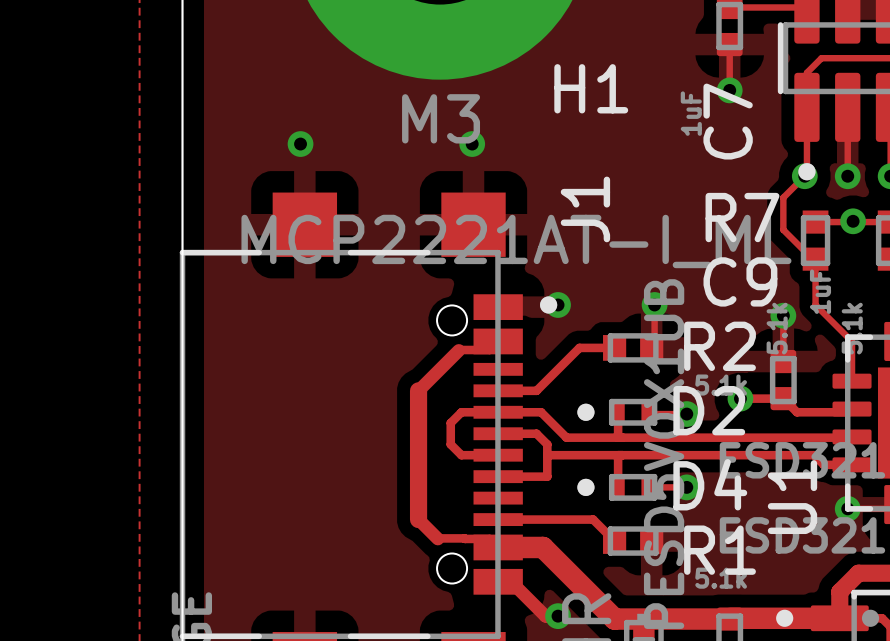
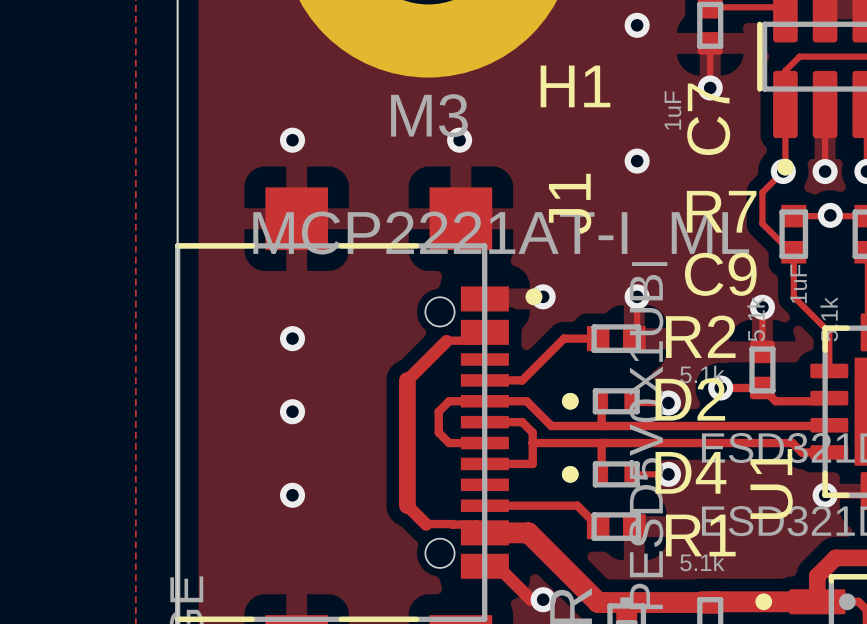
via: none -> (637, 25)
via: none -> (637, 161)
via: none -> (292, 338)
via: none -> (292, 411)
via: none -> (292, 495)

